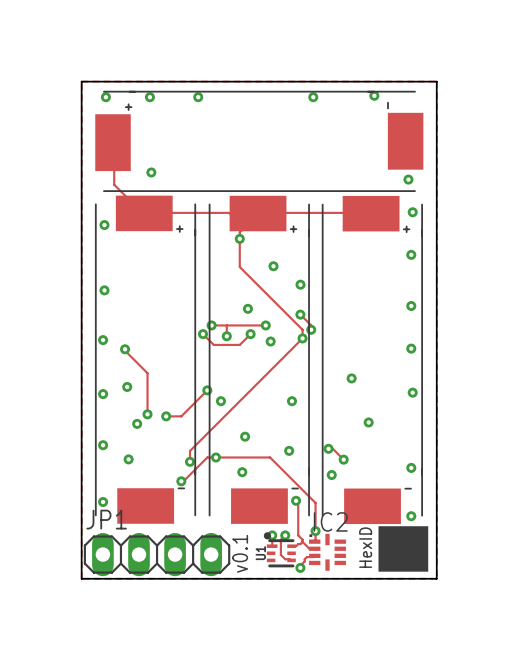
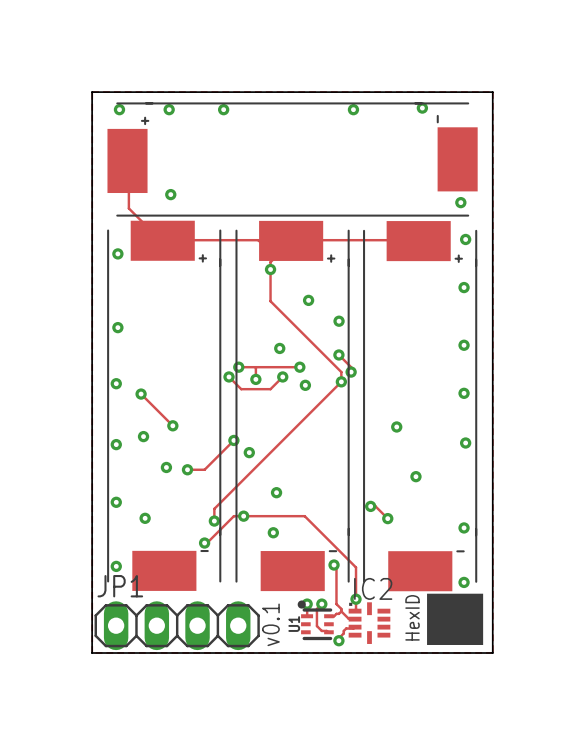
track: (125, 349) (147, 373) (147, 414) -> (141, 394) (172, 425)
via: (291, 401) -> none
via position: (137, 423) -> (172, 425)
via: (289, 450) -> none
via: (331, 475) -> none

